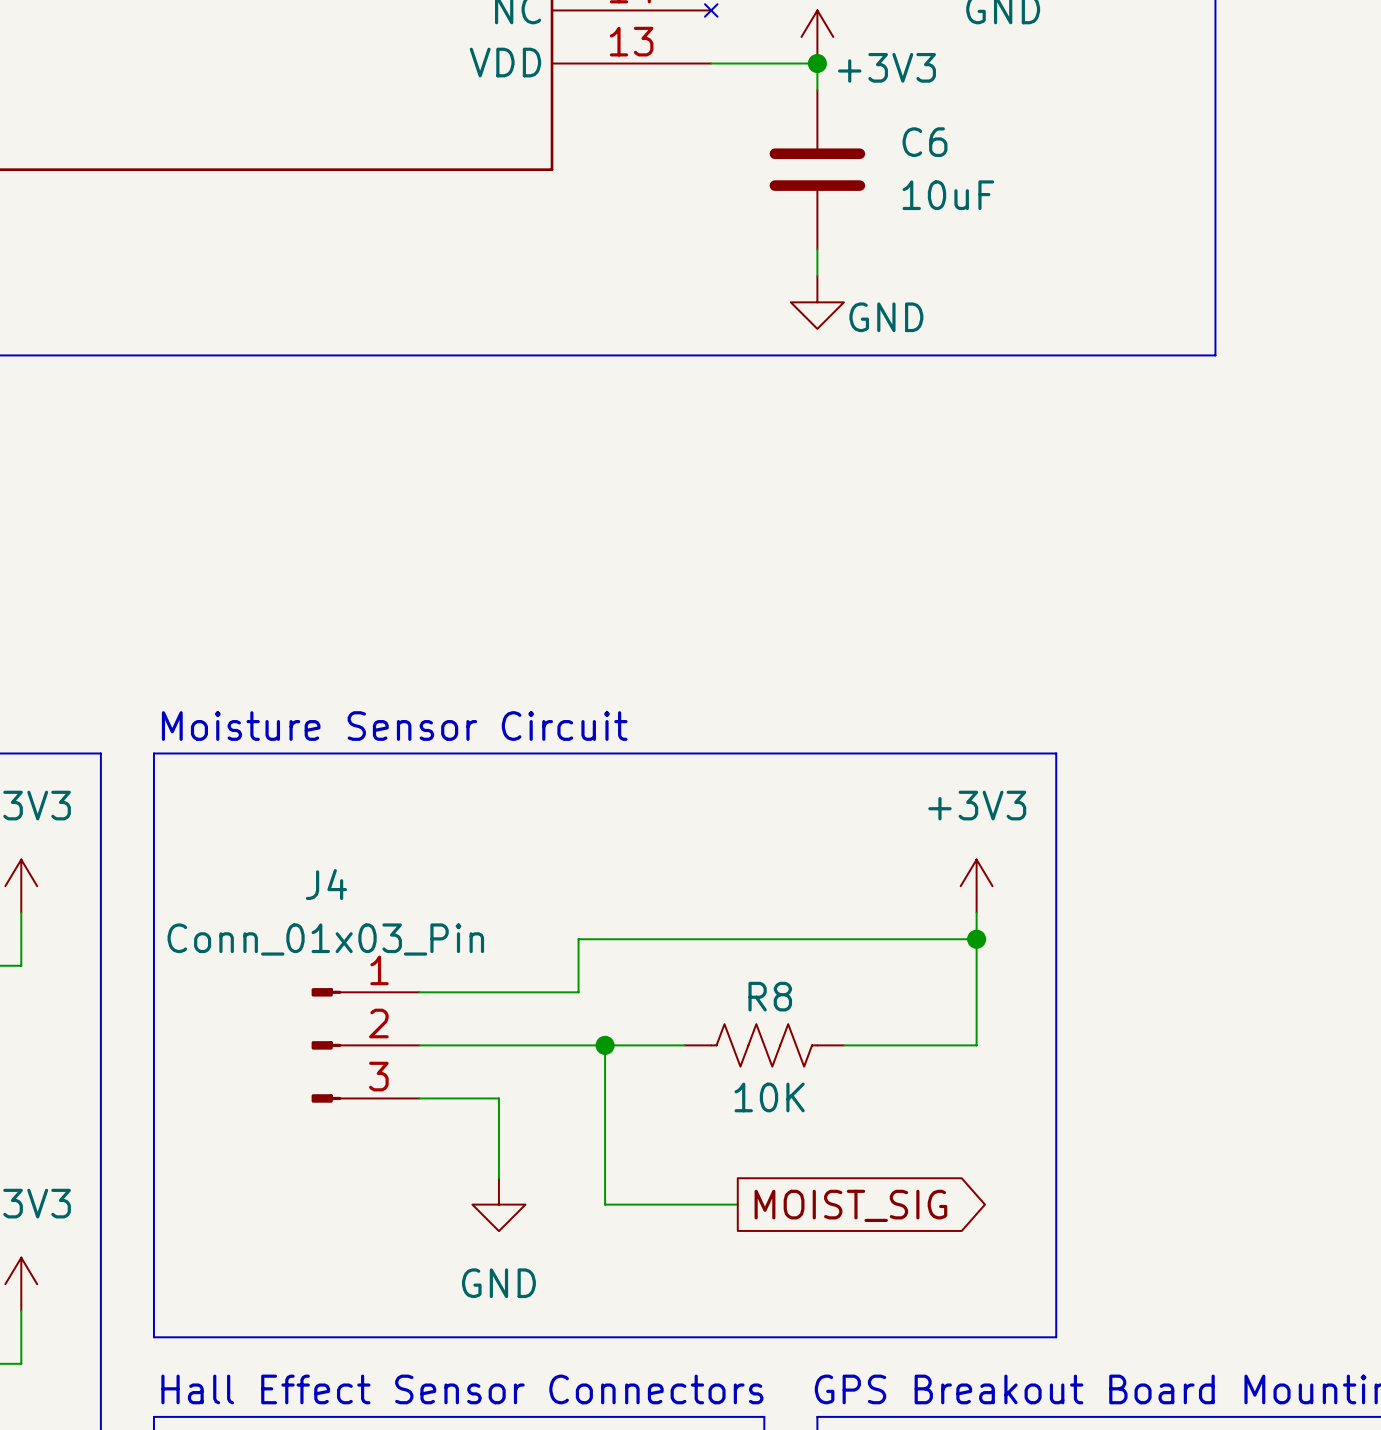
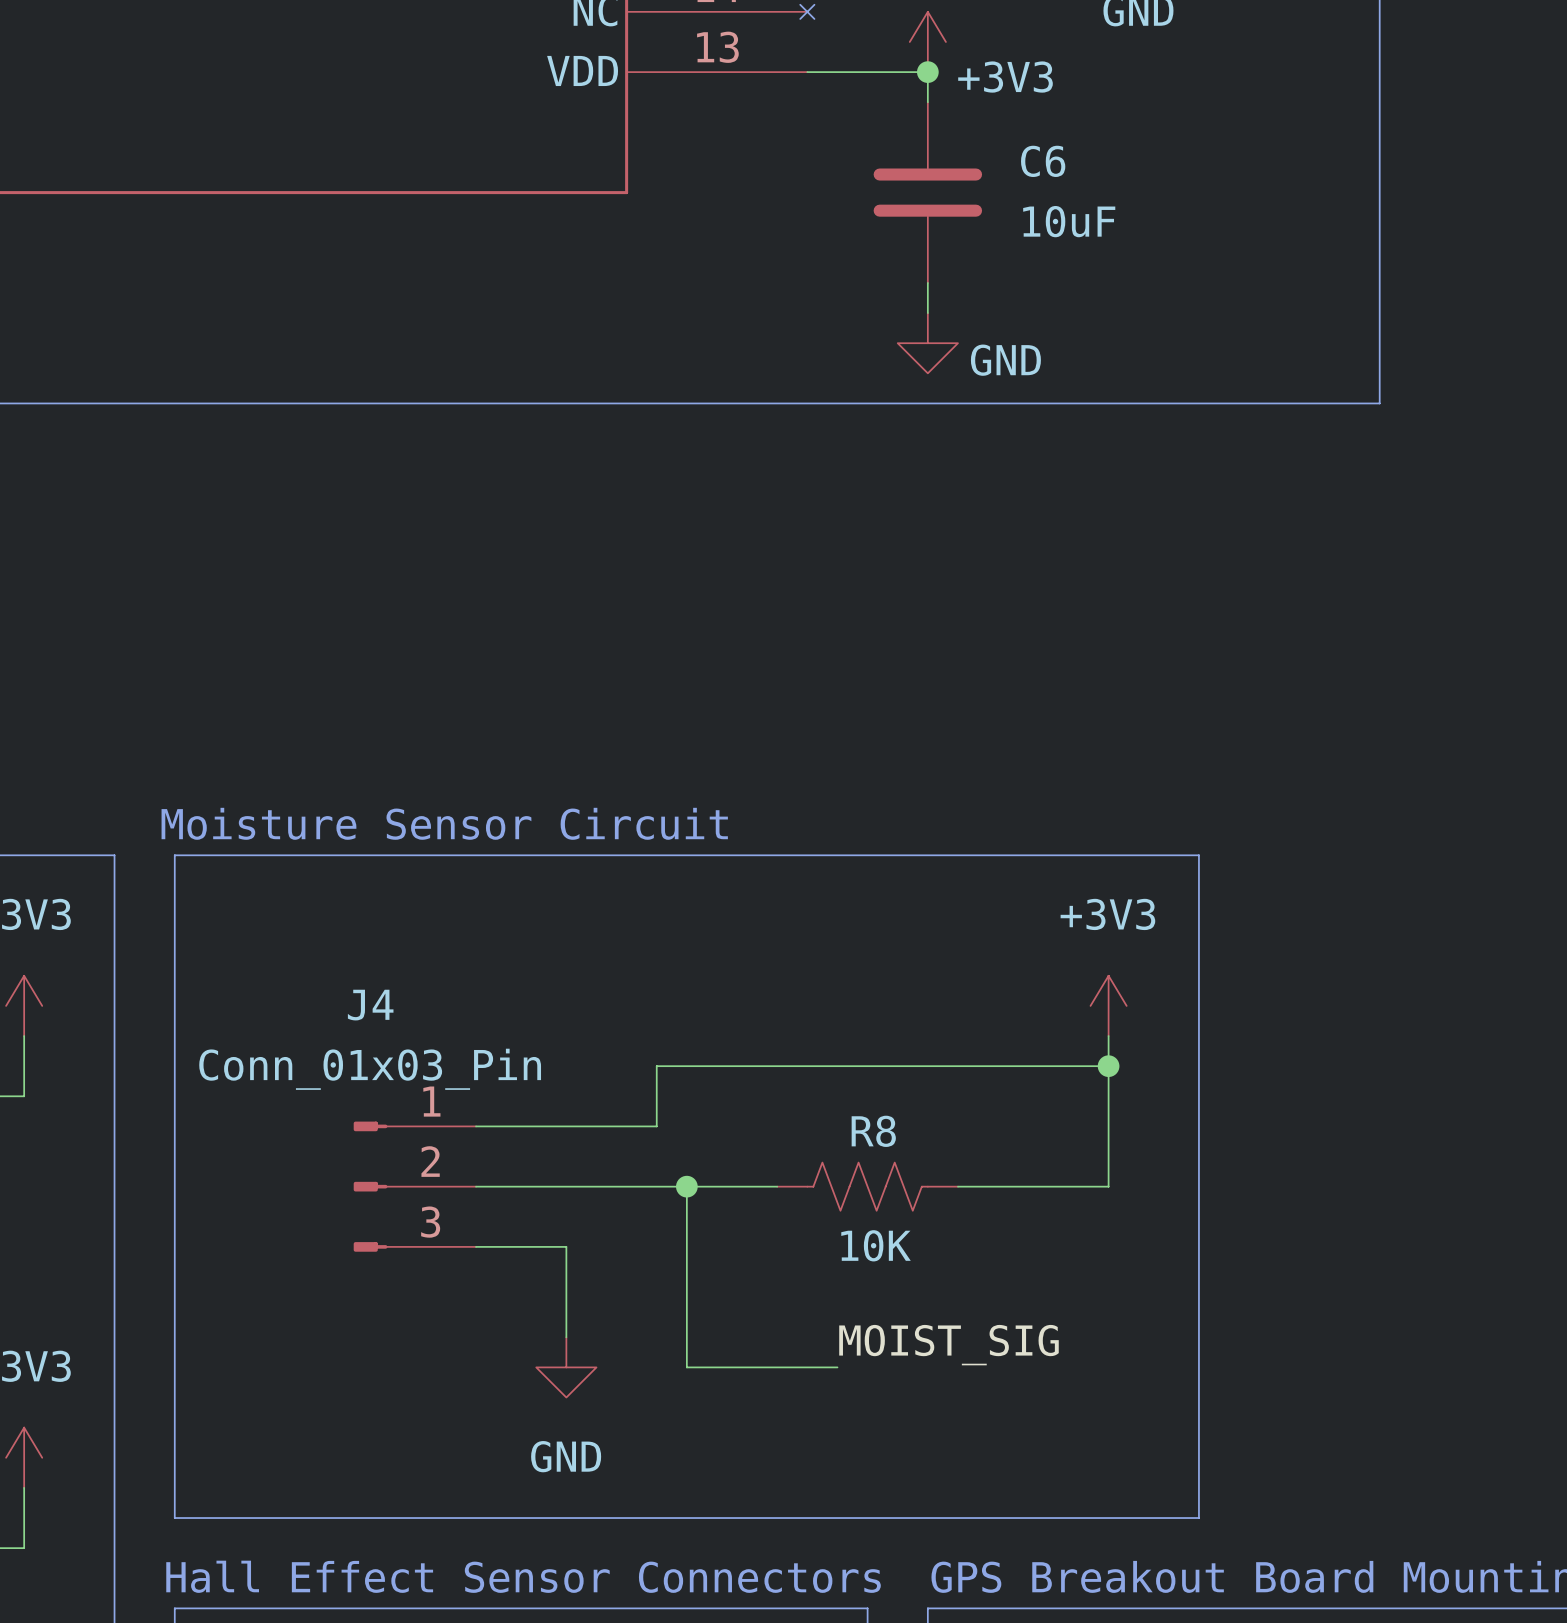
label: none -> MOIST_SIG (948, 1345)
global label: MOIST_SIG (850, 1205) -> none

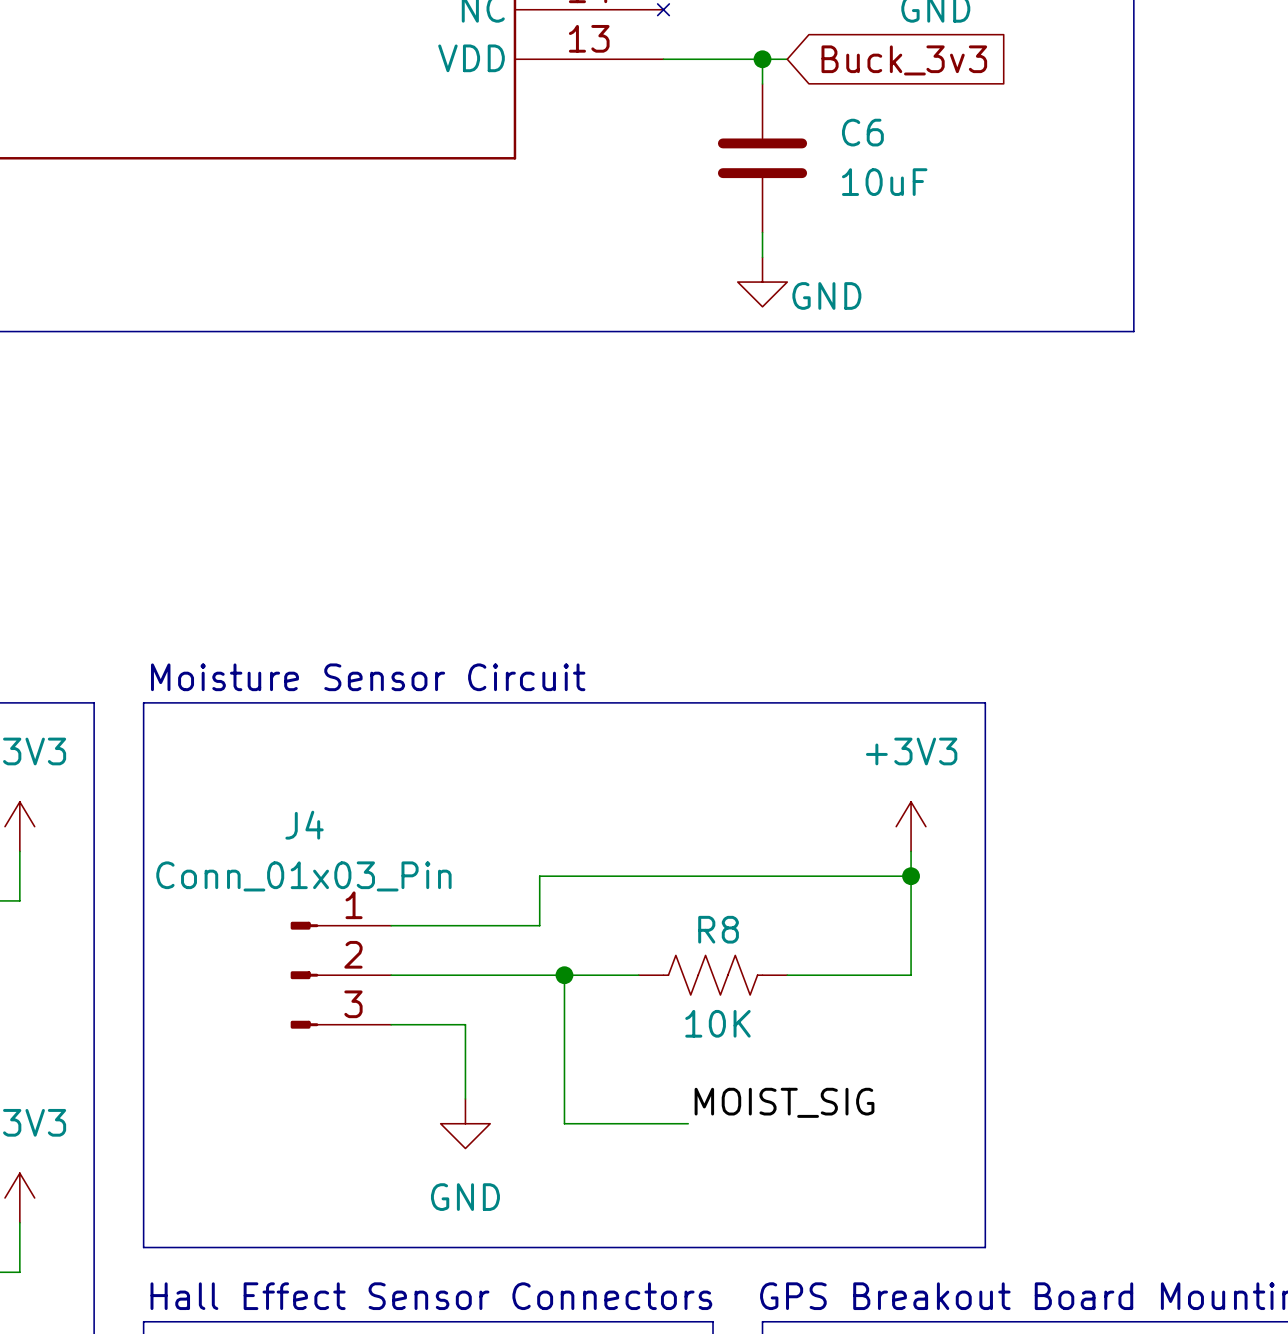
power symbol: +3V3 (927, 41) -> none
wire: none -> (762, 59) (787, 59)
global label: none -> Buck_3v3 (904, 60)

